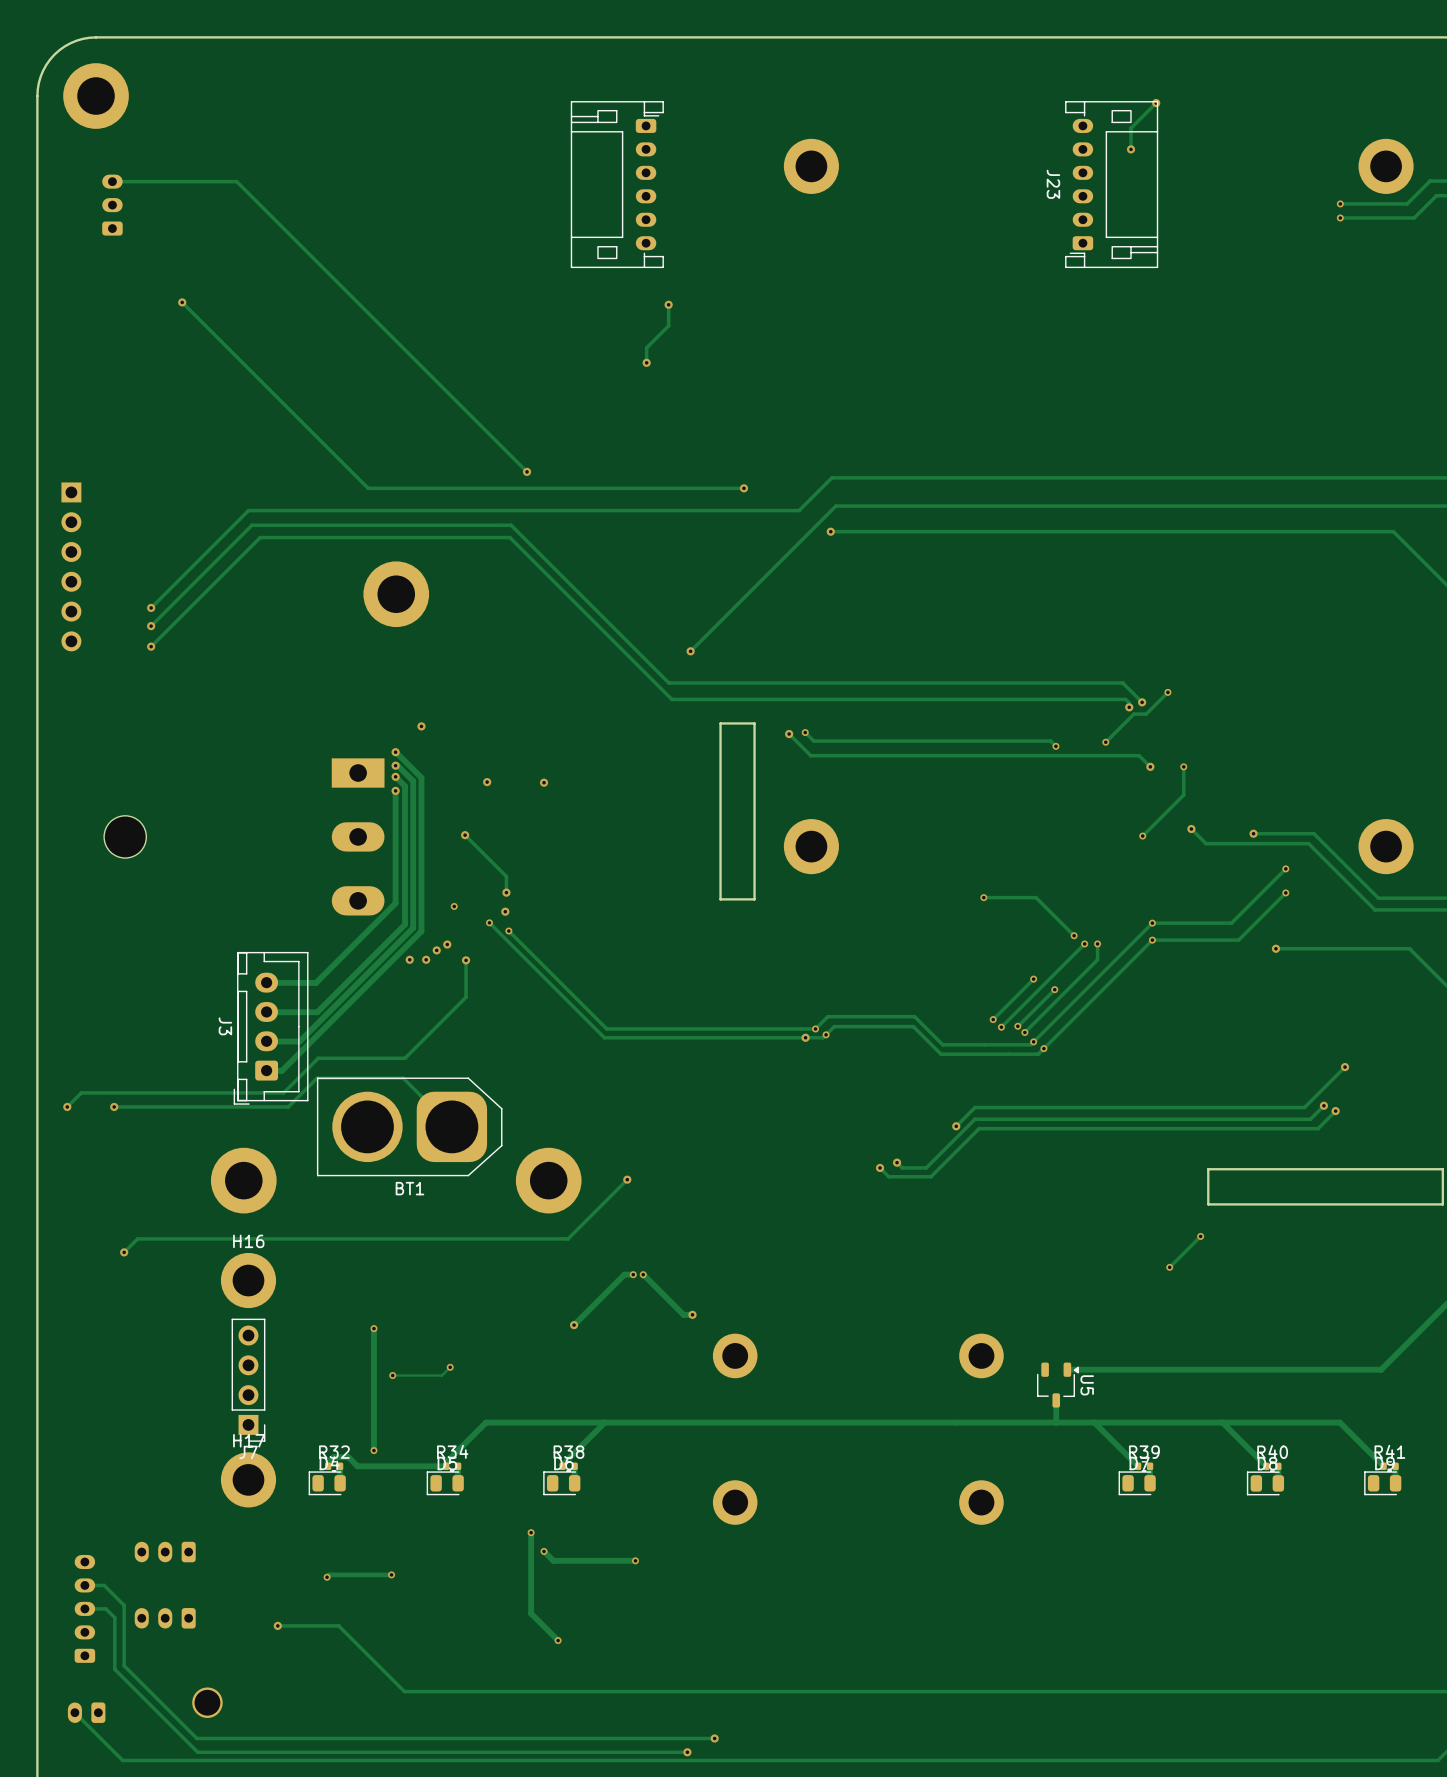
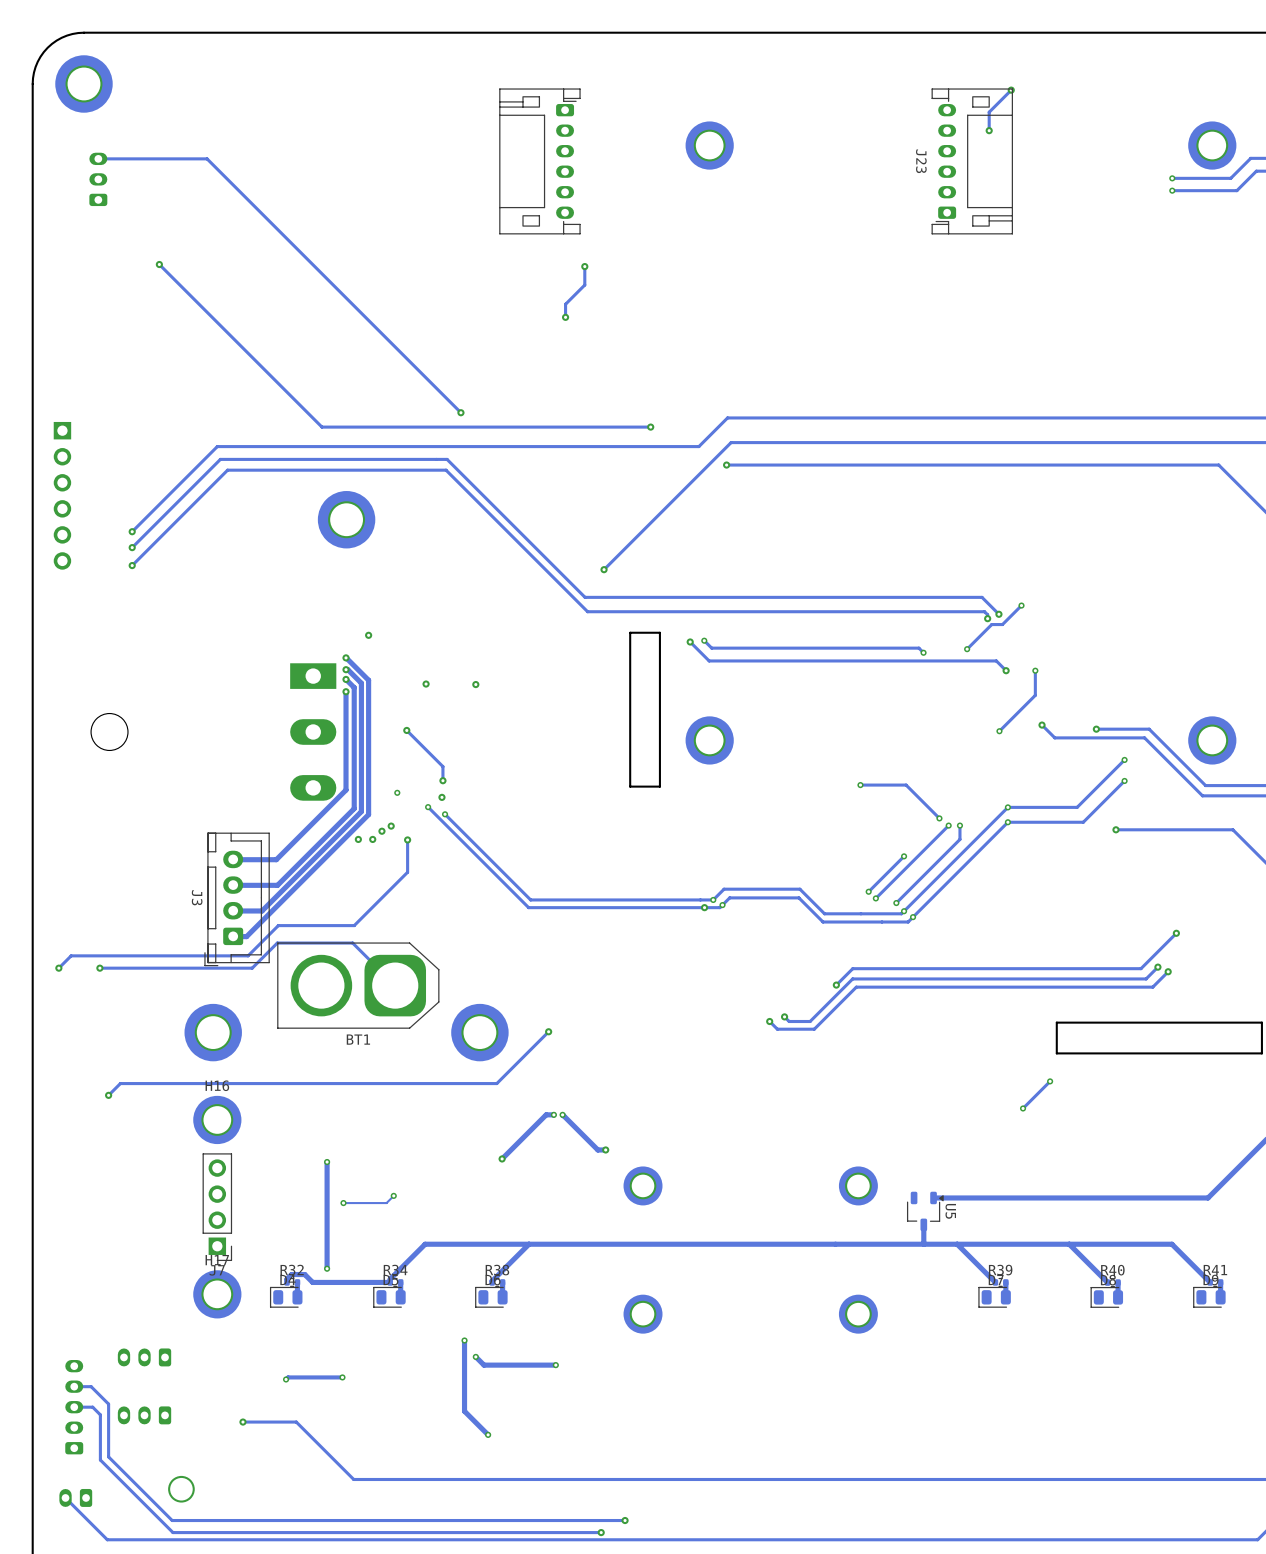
track: (1054, 989) (1017, 1026) -> none
via: (1054, 989) -> none
via: (1017, 1026) -> none

